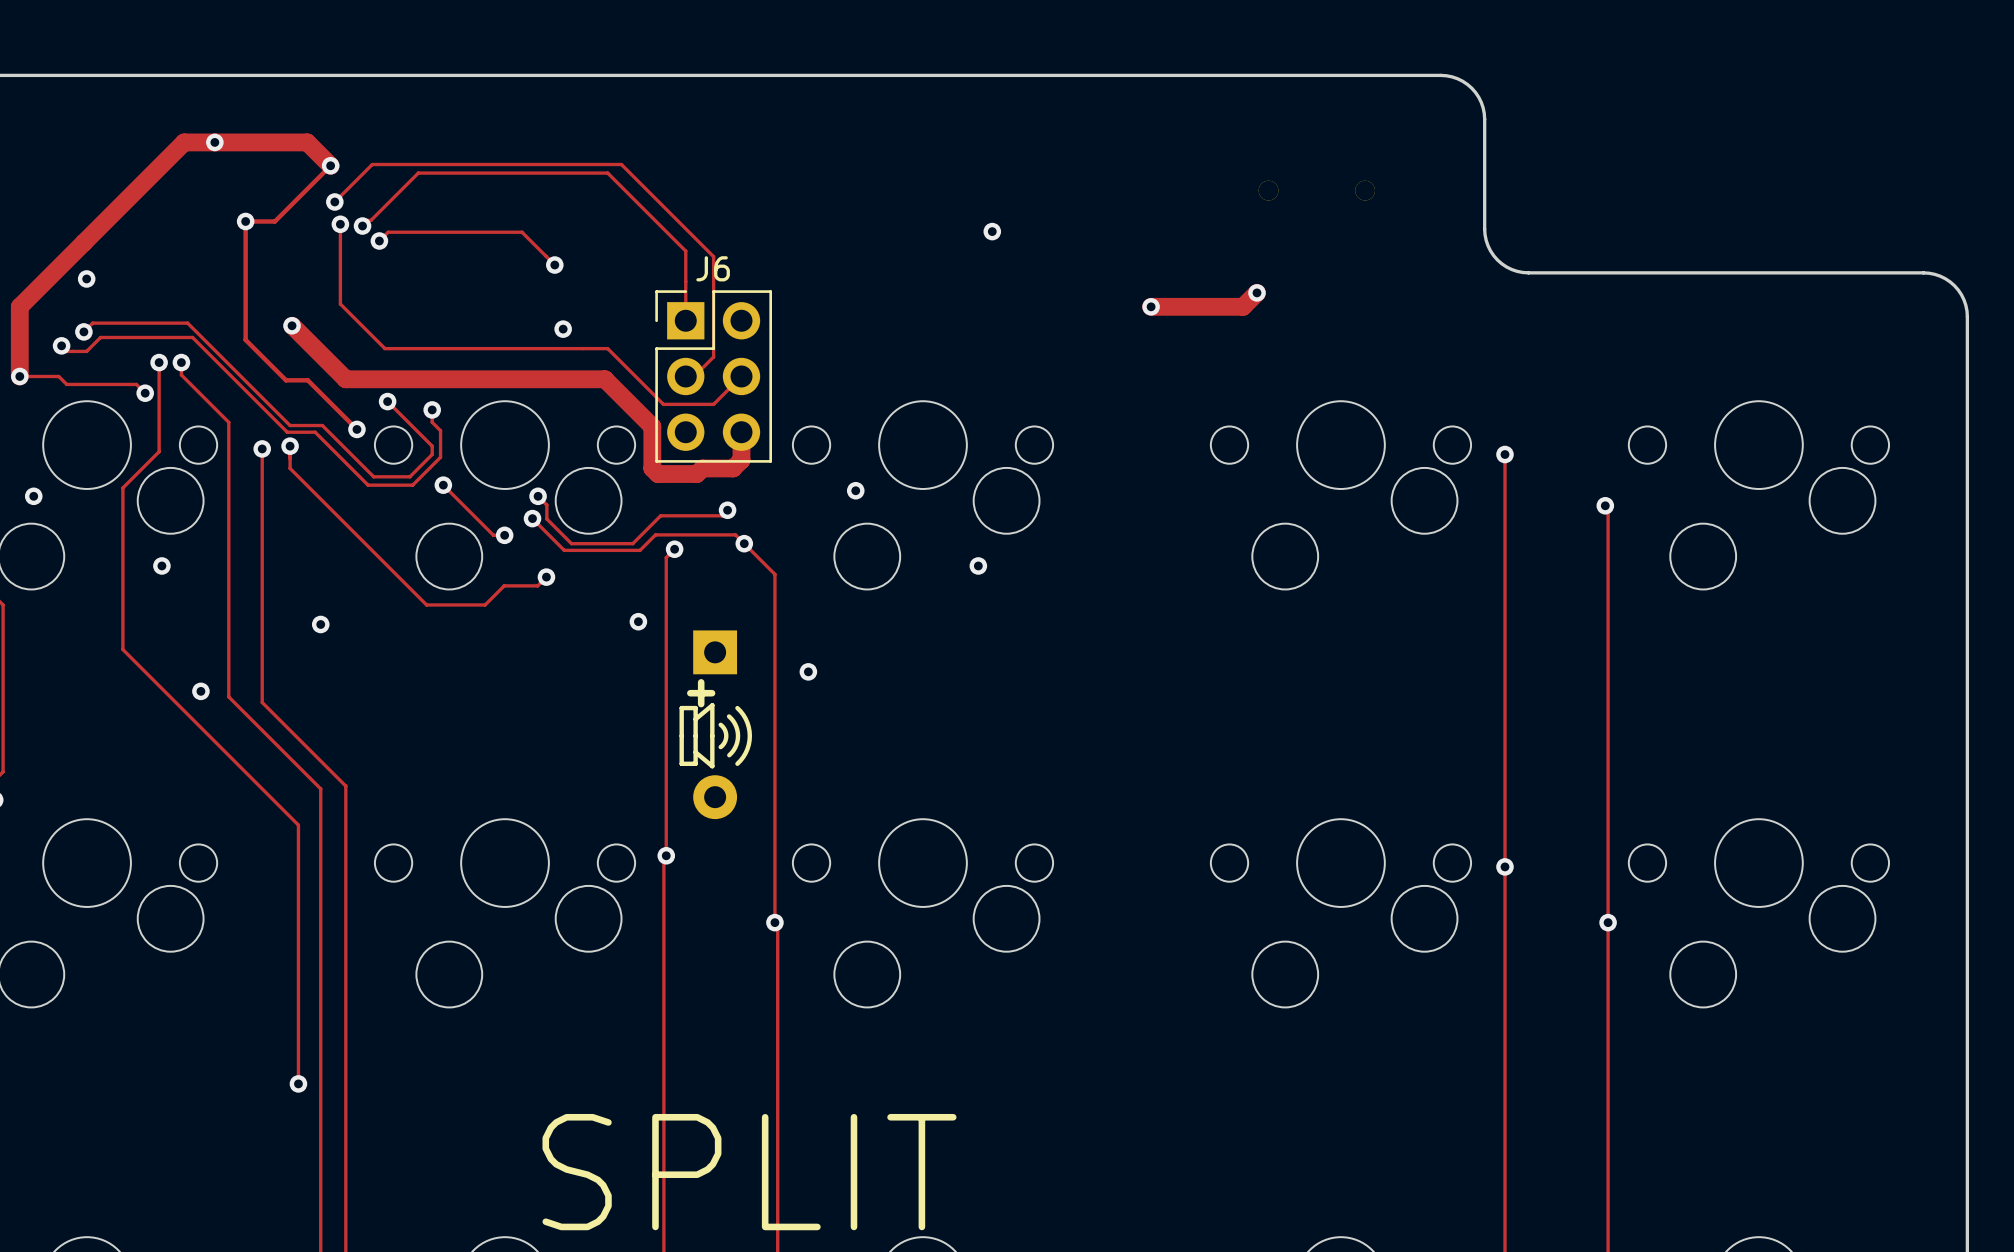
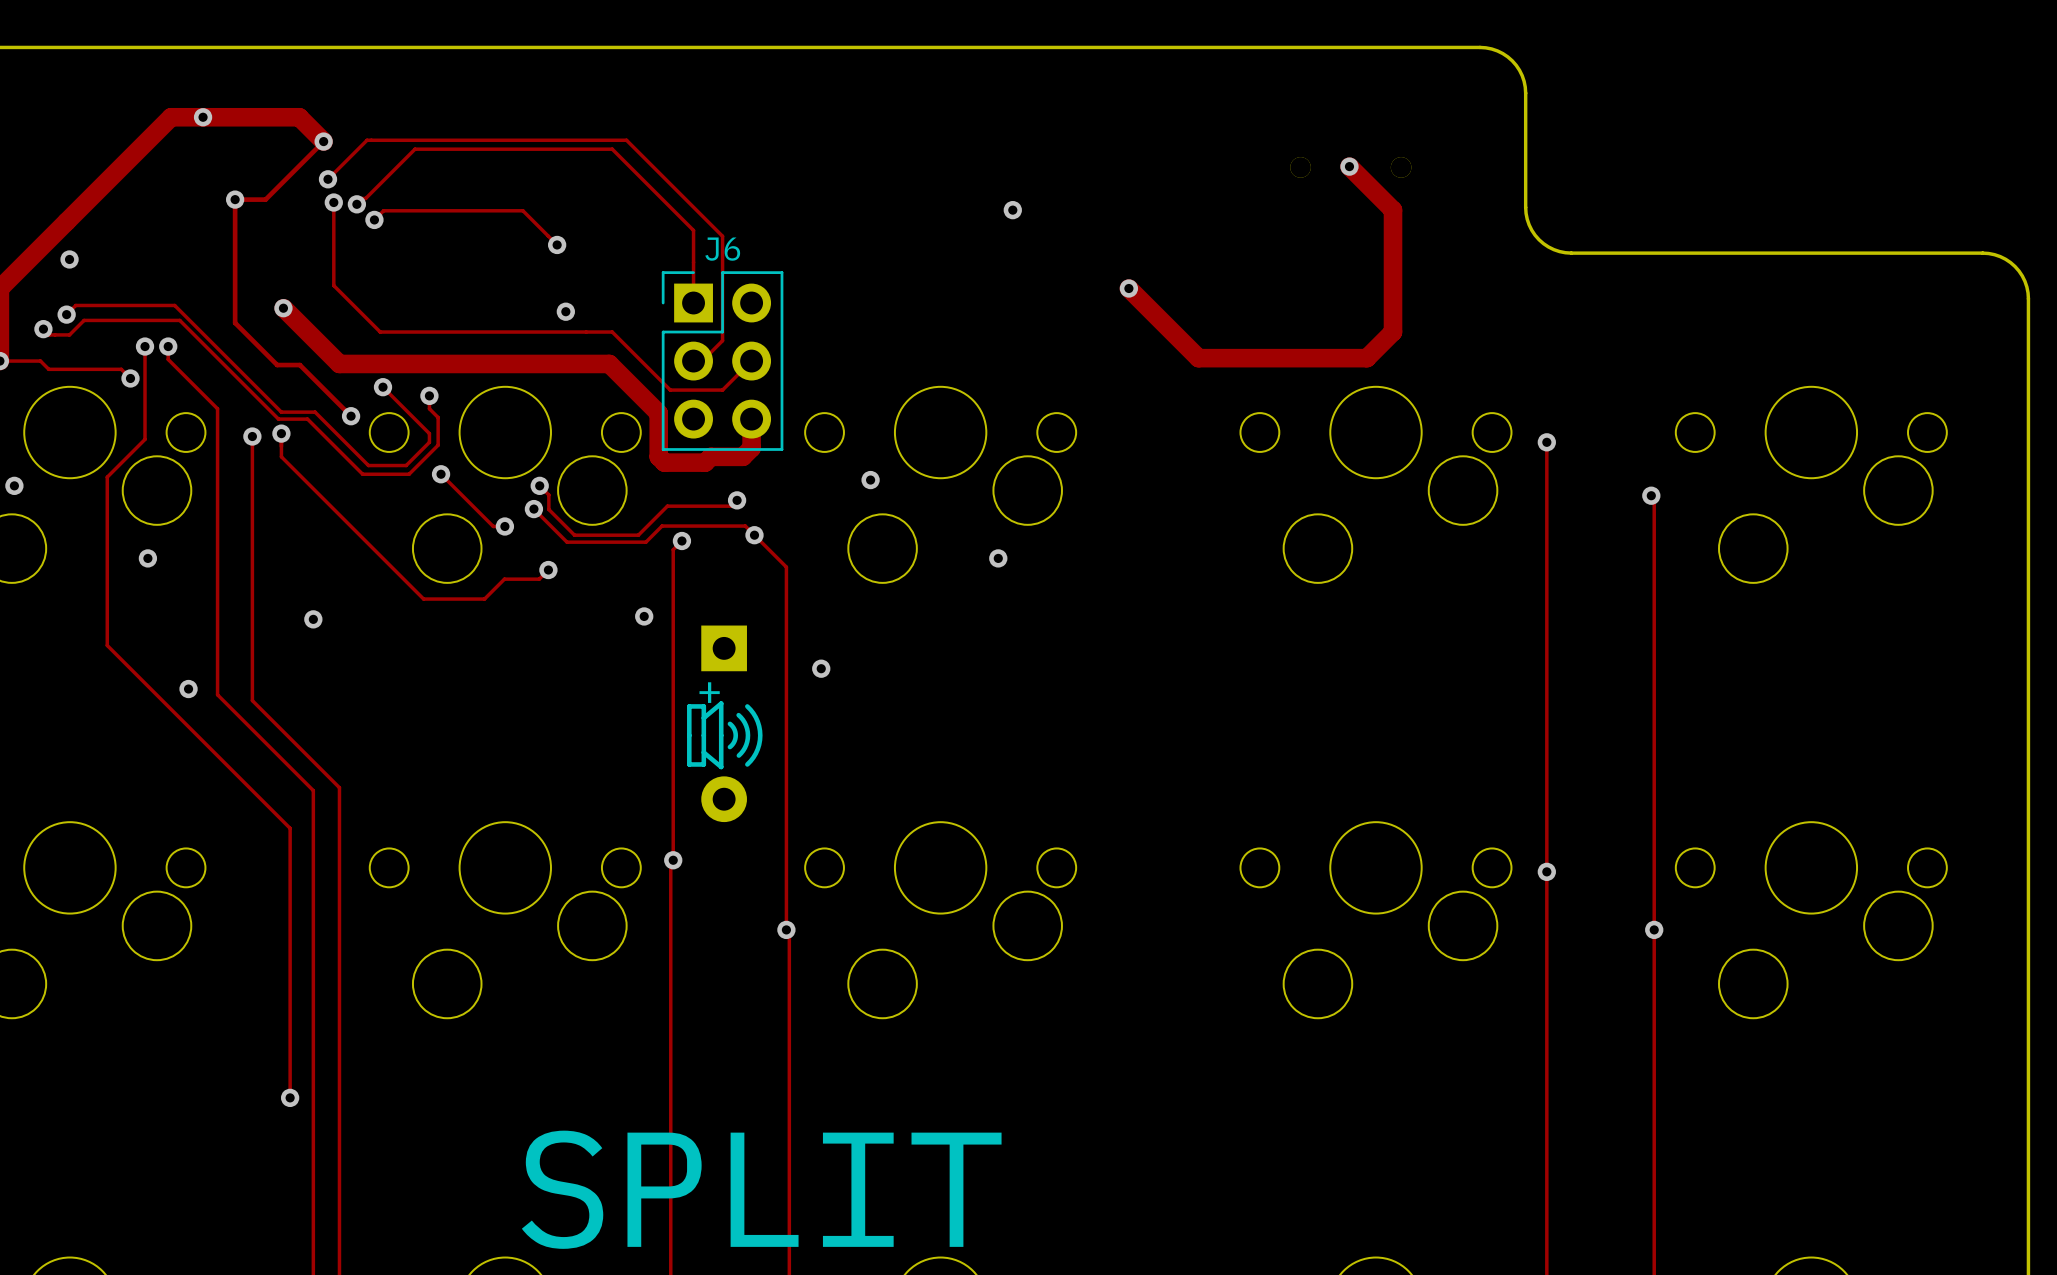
track: none -> (1349, 166) (1393, 210) (1393, 332) (1366, 358) (1198, 358) (1128, 288)
via: none -> (1349, 166)
track: (1256, 292) (1243, 306) (1151, 306) -> none
via: (1256, 292) -> none
via position: (1151, 306) -> (1128, 288)

